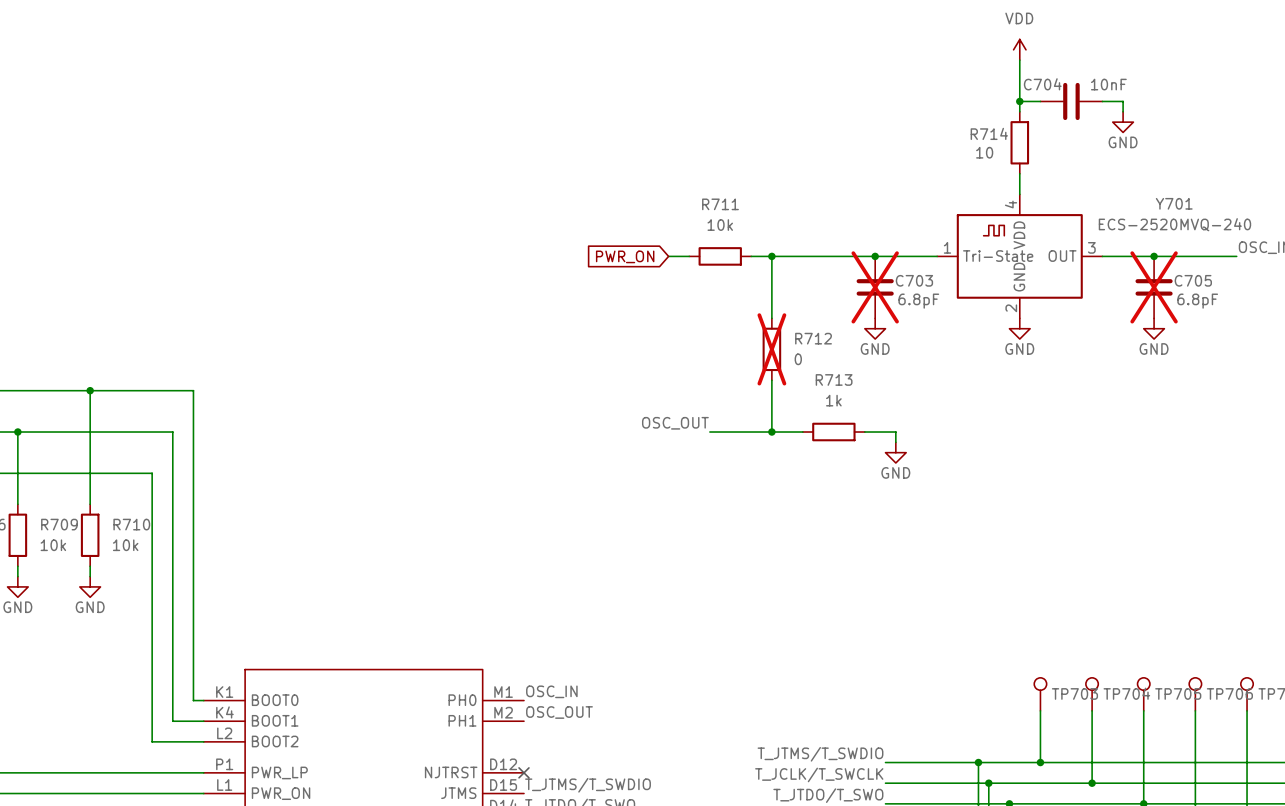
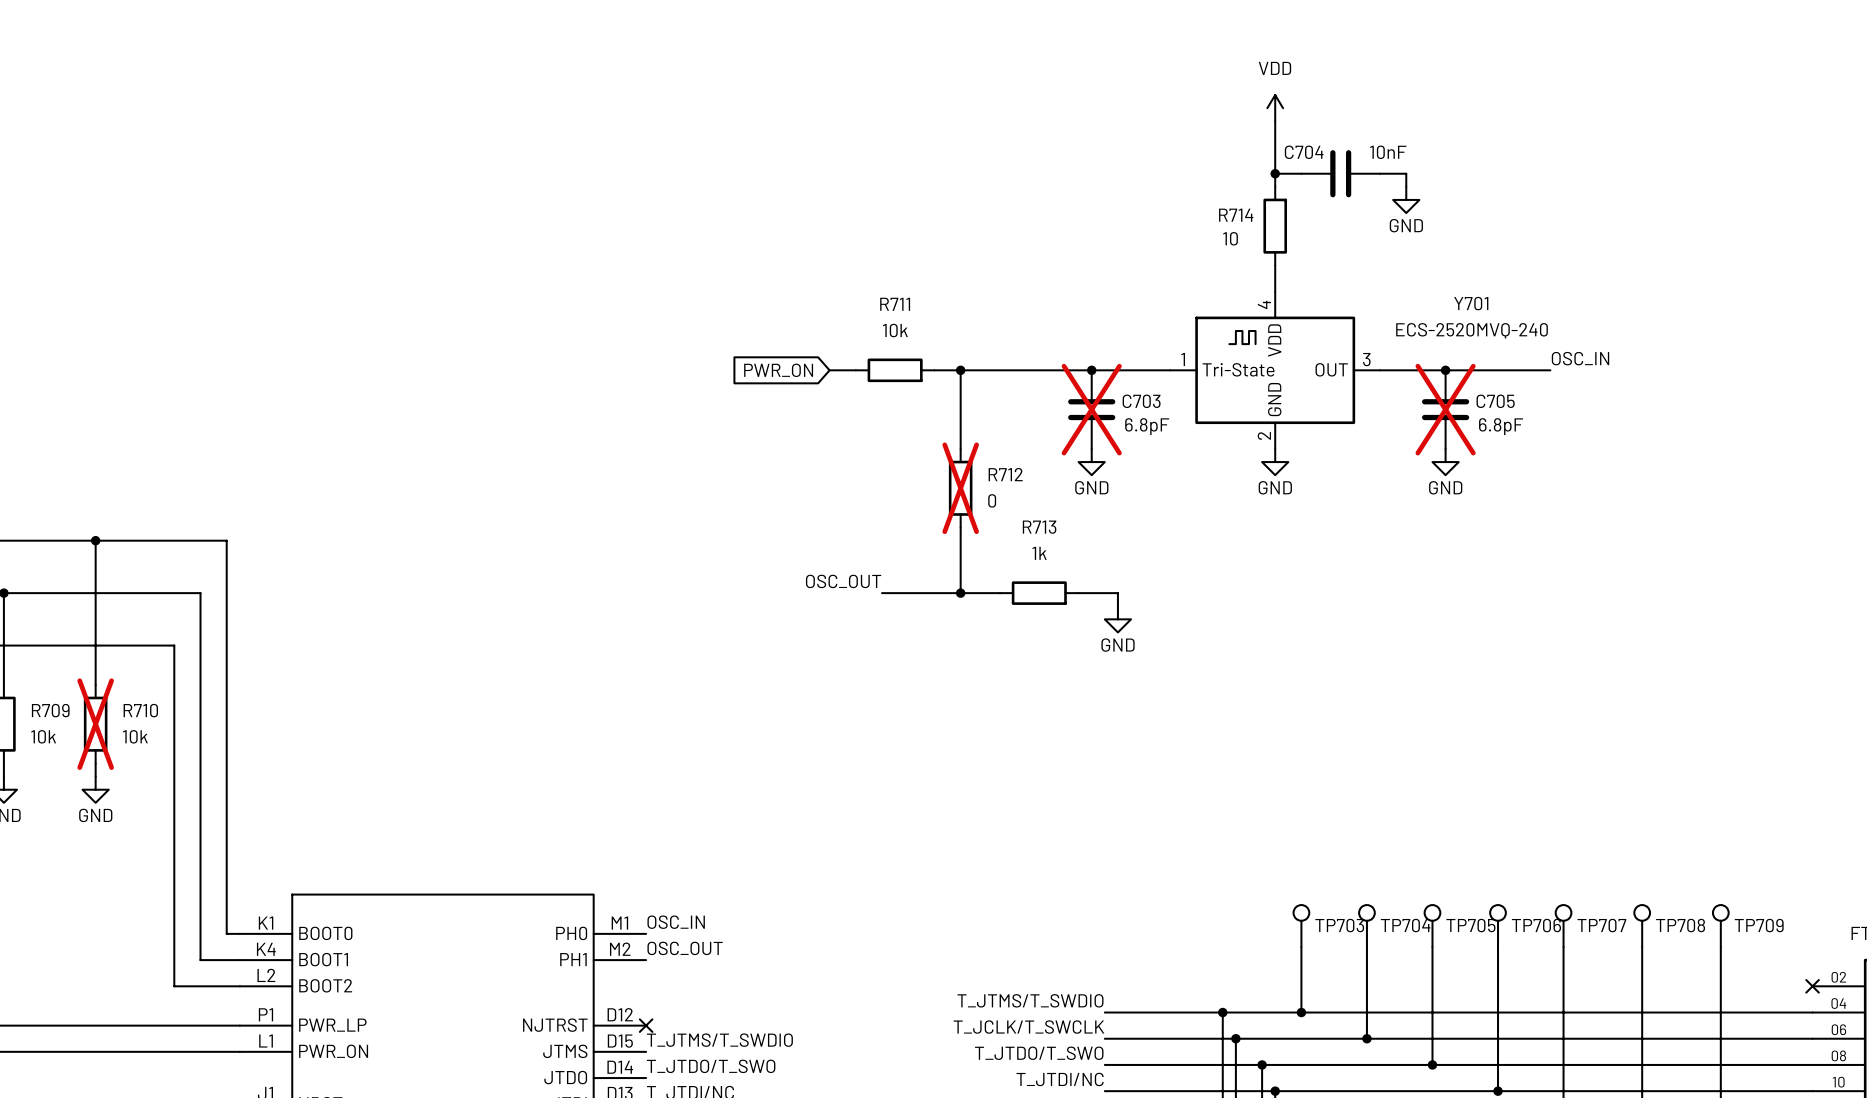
R710 do-not-place cross: none -> (95, 724)

